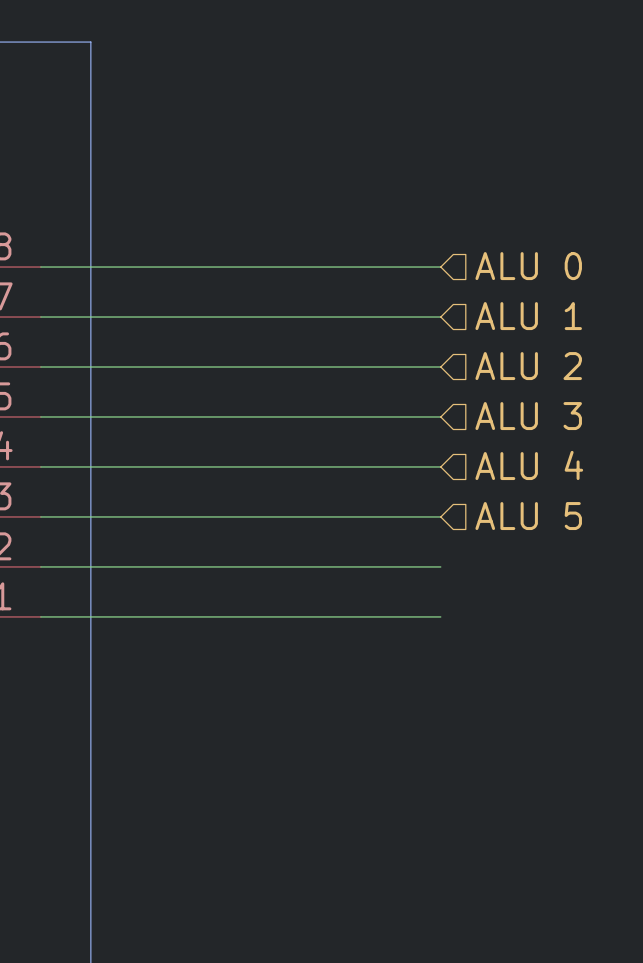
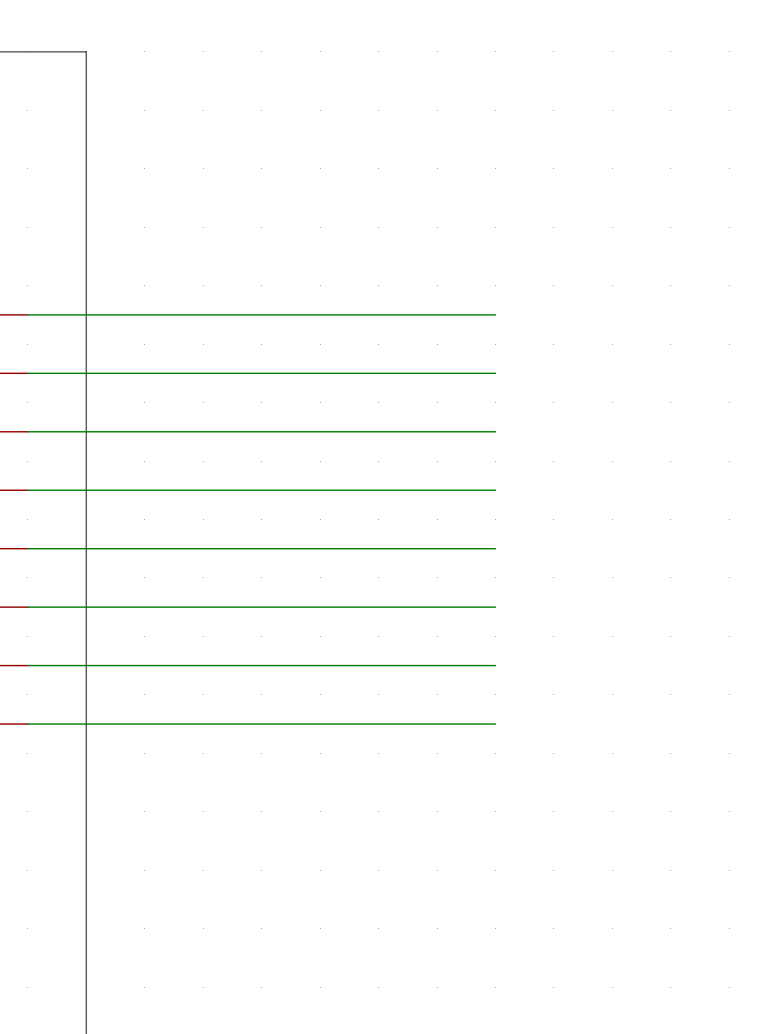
hierarchical label: ALU 0 (528, 266) -> none
hierarchical label: ALU 1 (528, 316) -> none
hierarchical label: ALU 2 (528, 366) -> none
hierarchical label: ALU 3 (528, 416) -> none
hierarchical label: ALU 4 (529, 465) -> none
hierarchical label: ALU 5 (528, 516) -> none

